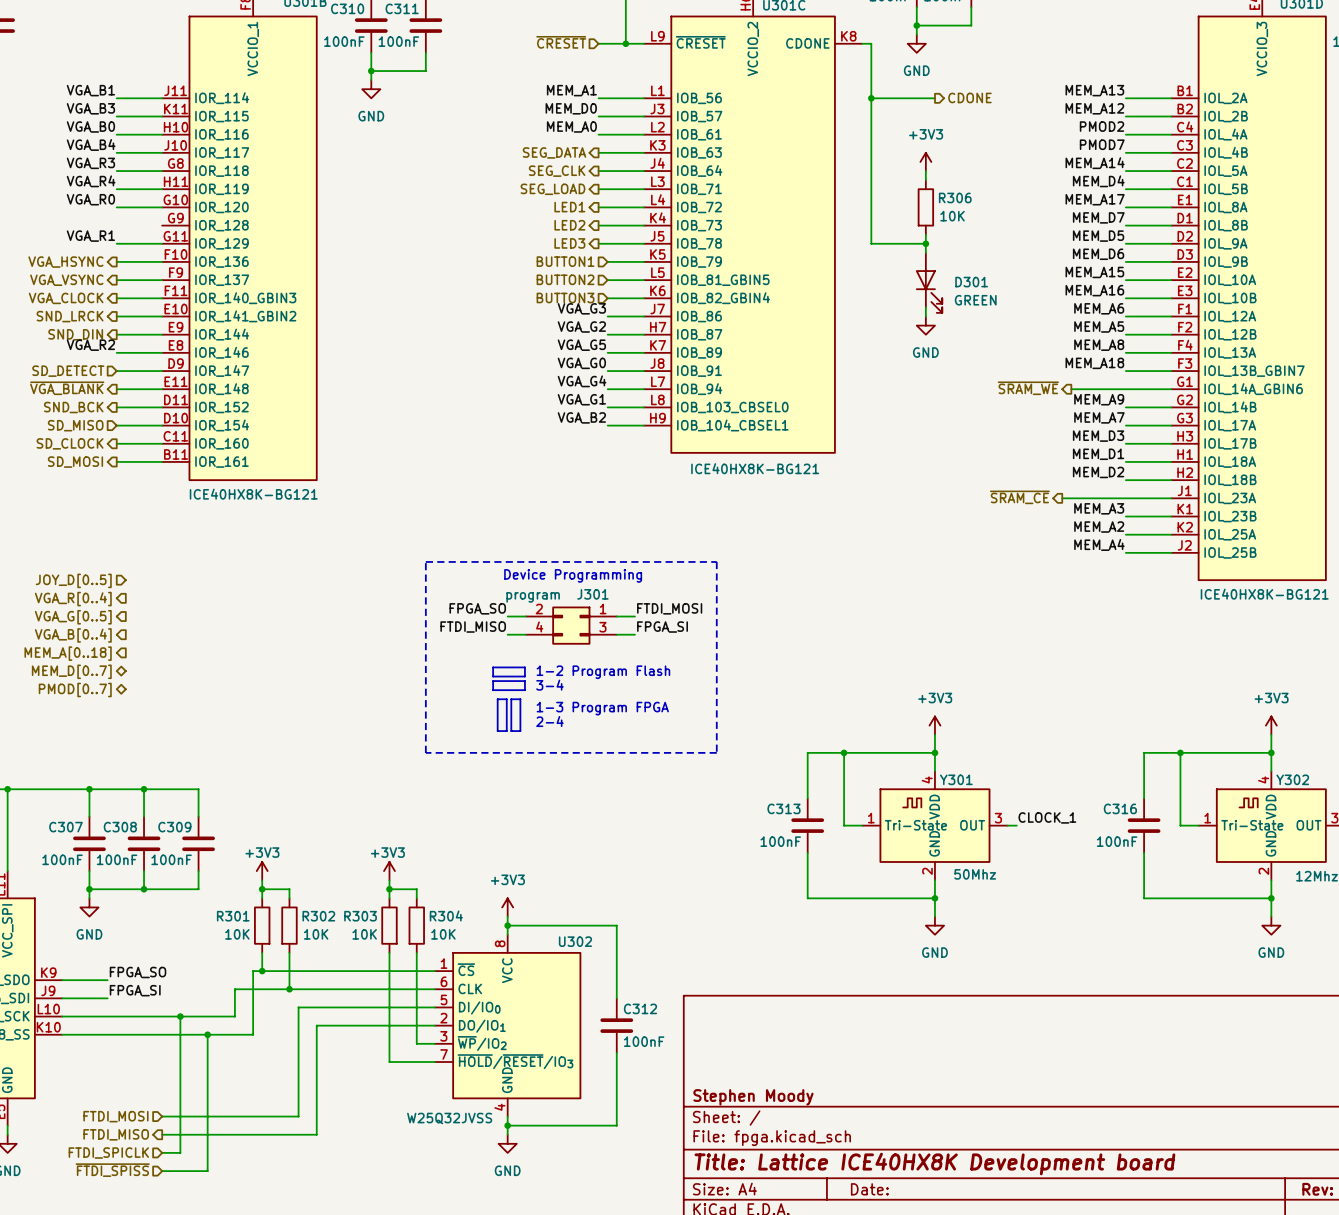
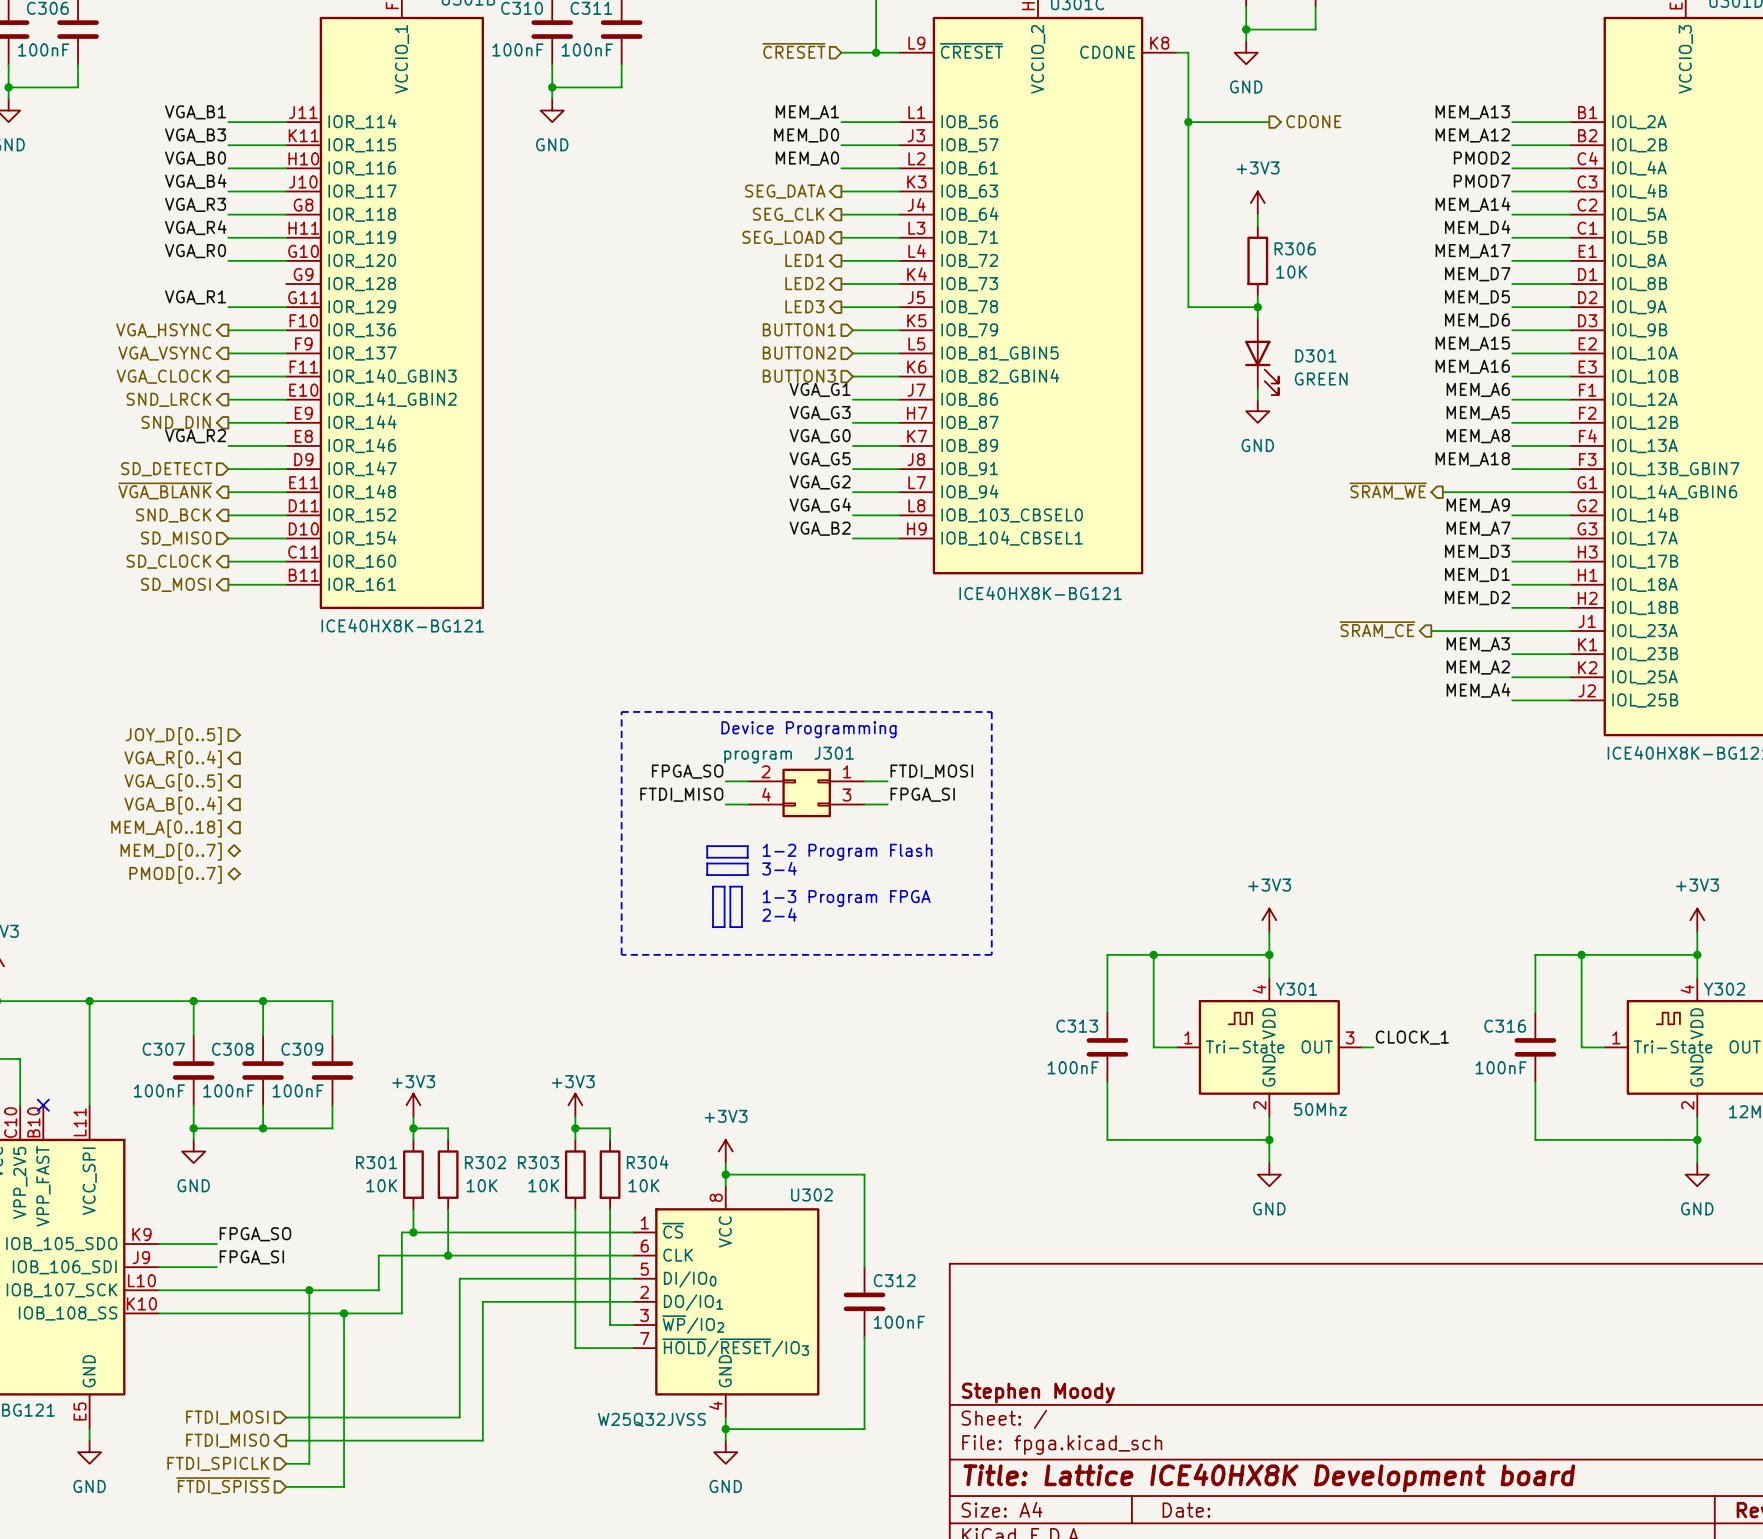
label: VGA_G3 (581, 308) -> VGA_G1 (820, 389)
label: VGA_G2 (581, 327) -> VGA_G3 (820, 413)
label: VGA_G5 (581, 345) -> VGA_G0 (820, 436)
label: VGA_G0 (581, 363) -> VGA_G5 (820, 459)
label: VGA_G4 (582, 381) -> VGA_G2 (820, 482)
label: VGA_G1 (581, 399) -> VGA_G4 (820, 505)

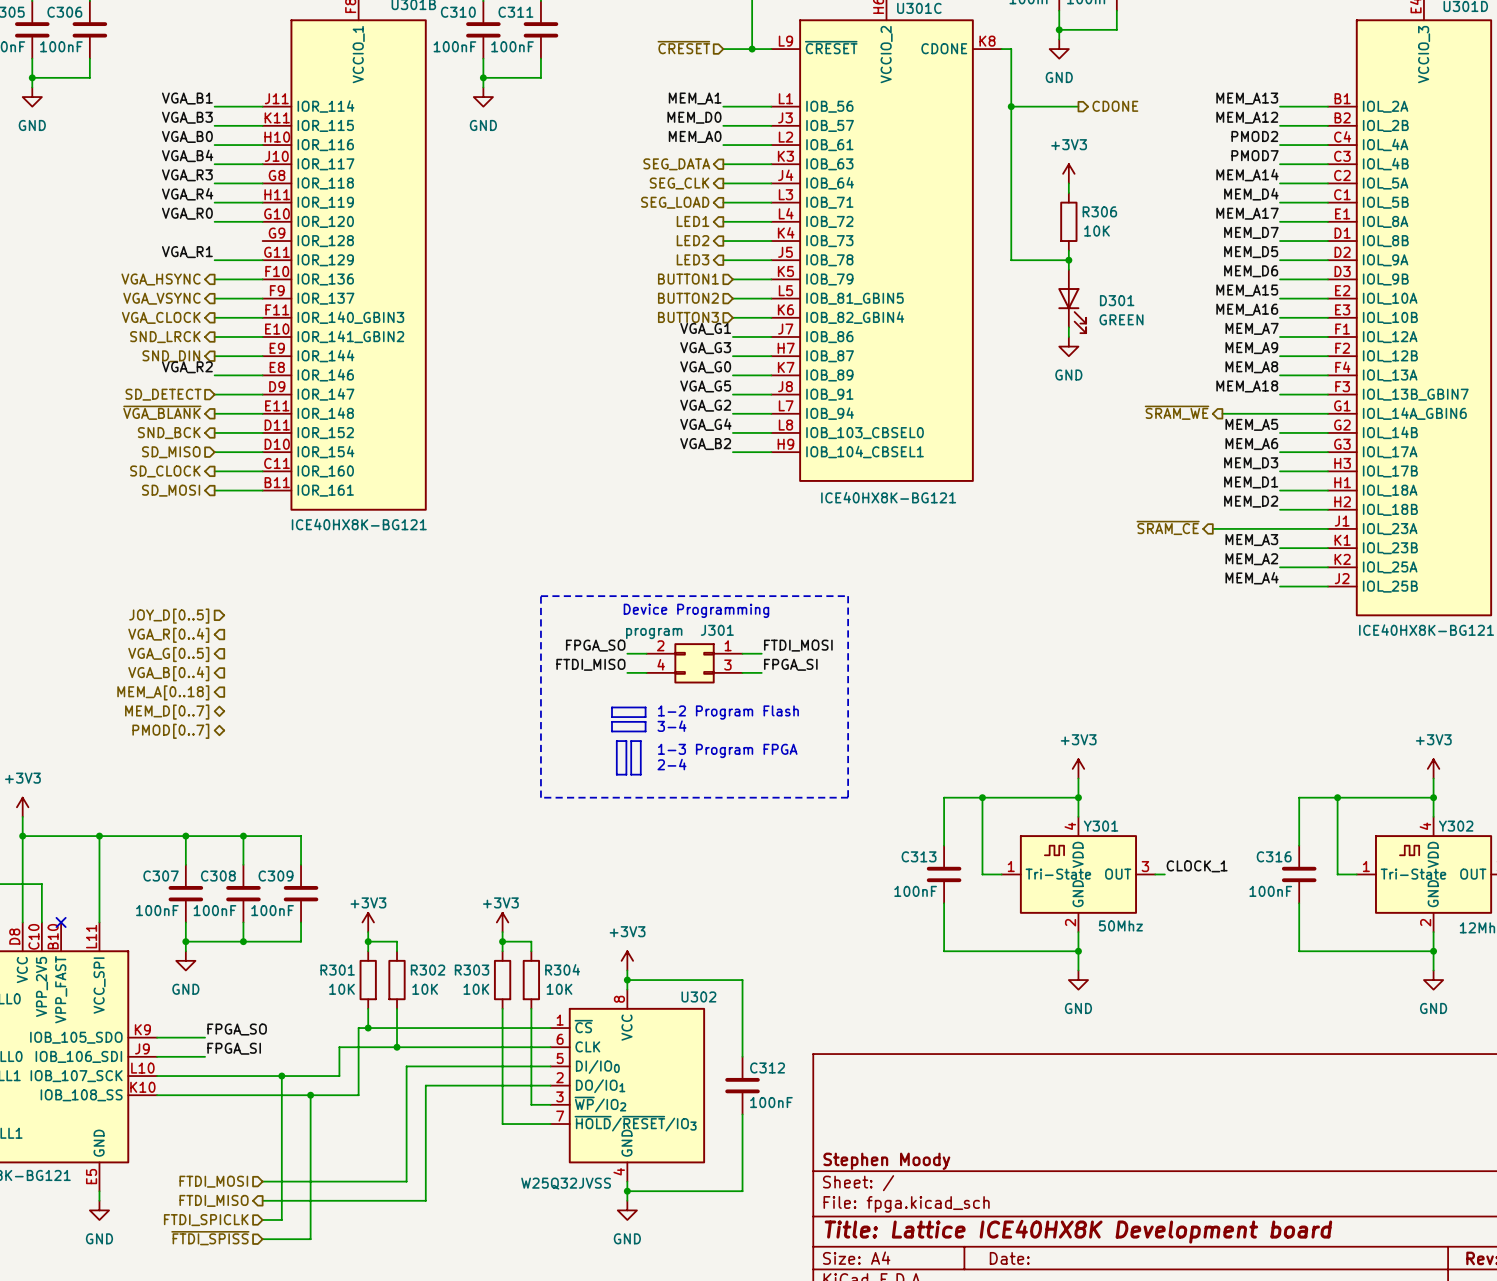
label: MEM_A6 (1478, 389) -> MEM_A7 (1252, 328)
label: MEM_A5 (1478, 413) -> MEM_A9 (1251, 348)
label: MEM_A9 (1478, 505) -> MEM_A5 (1251, 424)
label: MEM_A7 (1478, 528) -> MEM_A6 (1251, 444)

